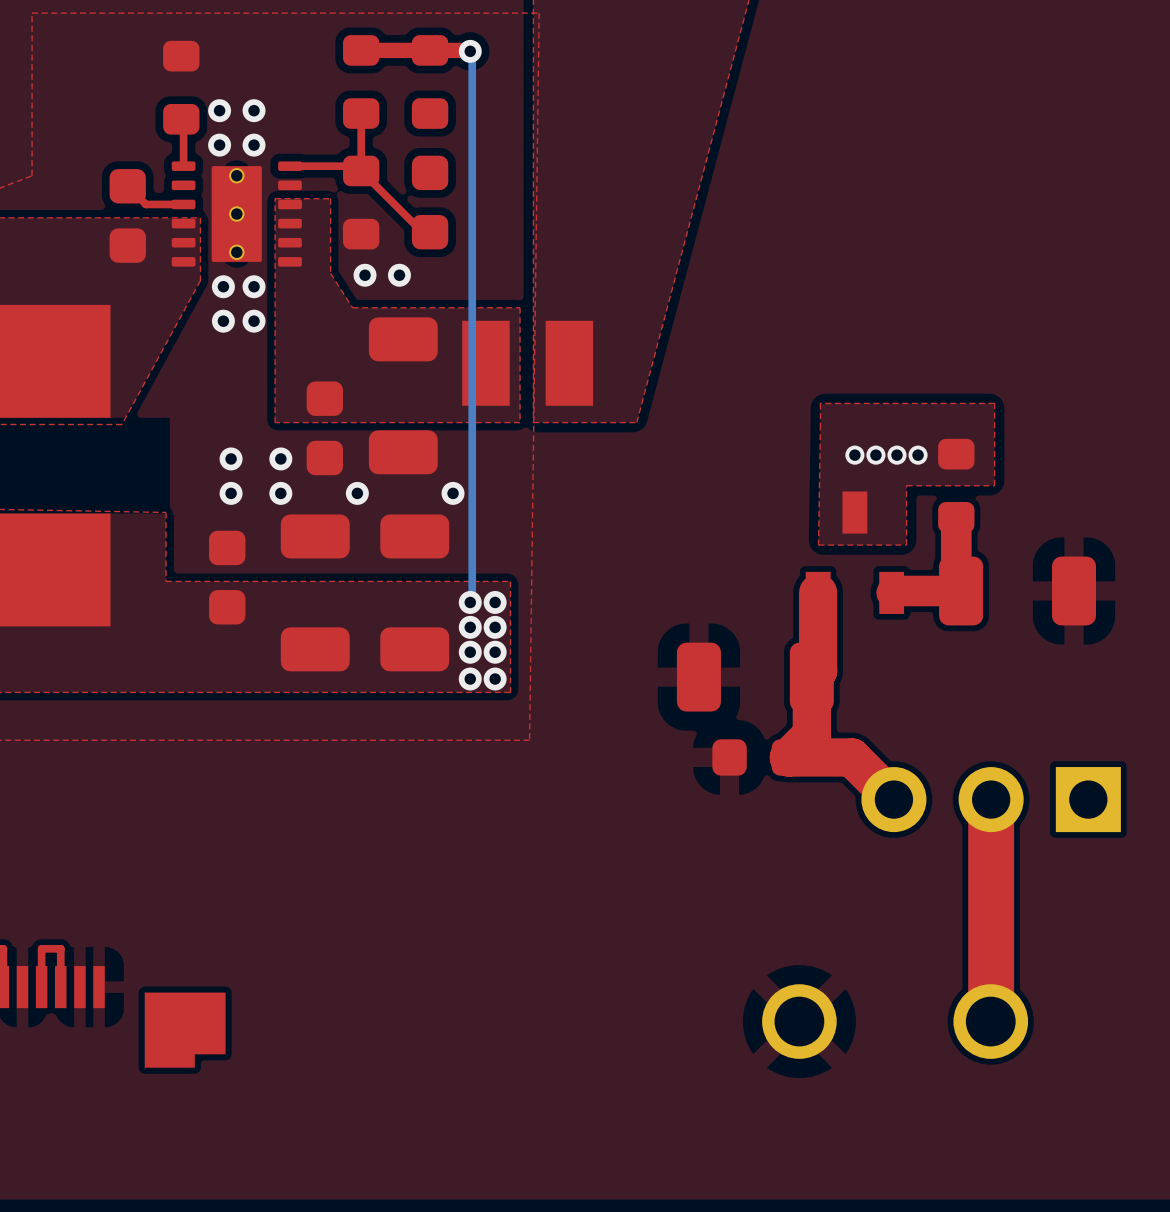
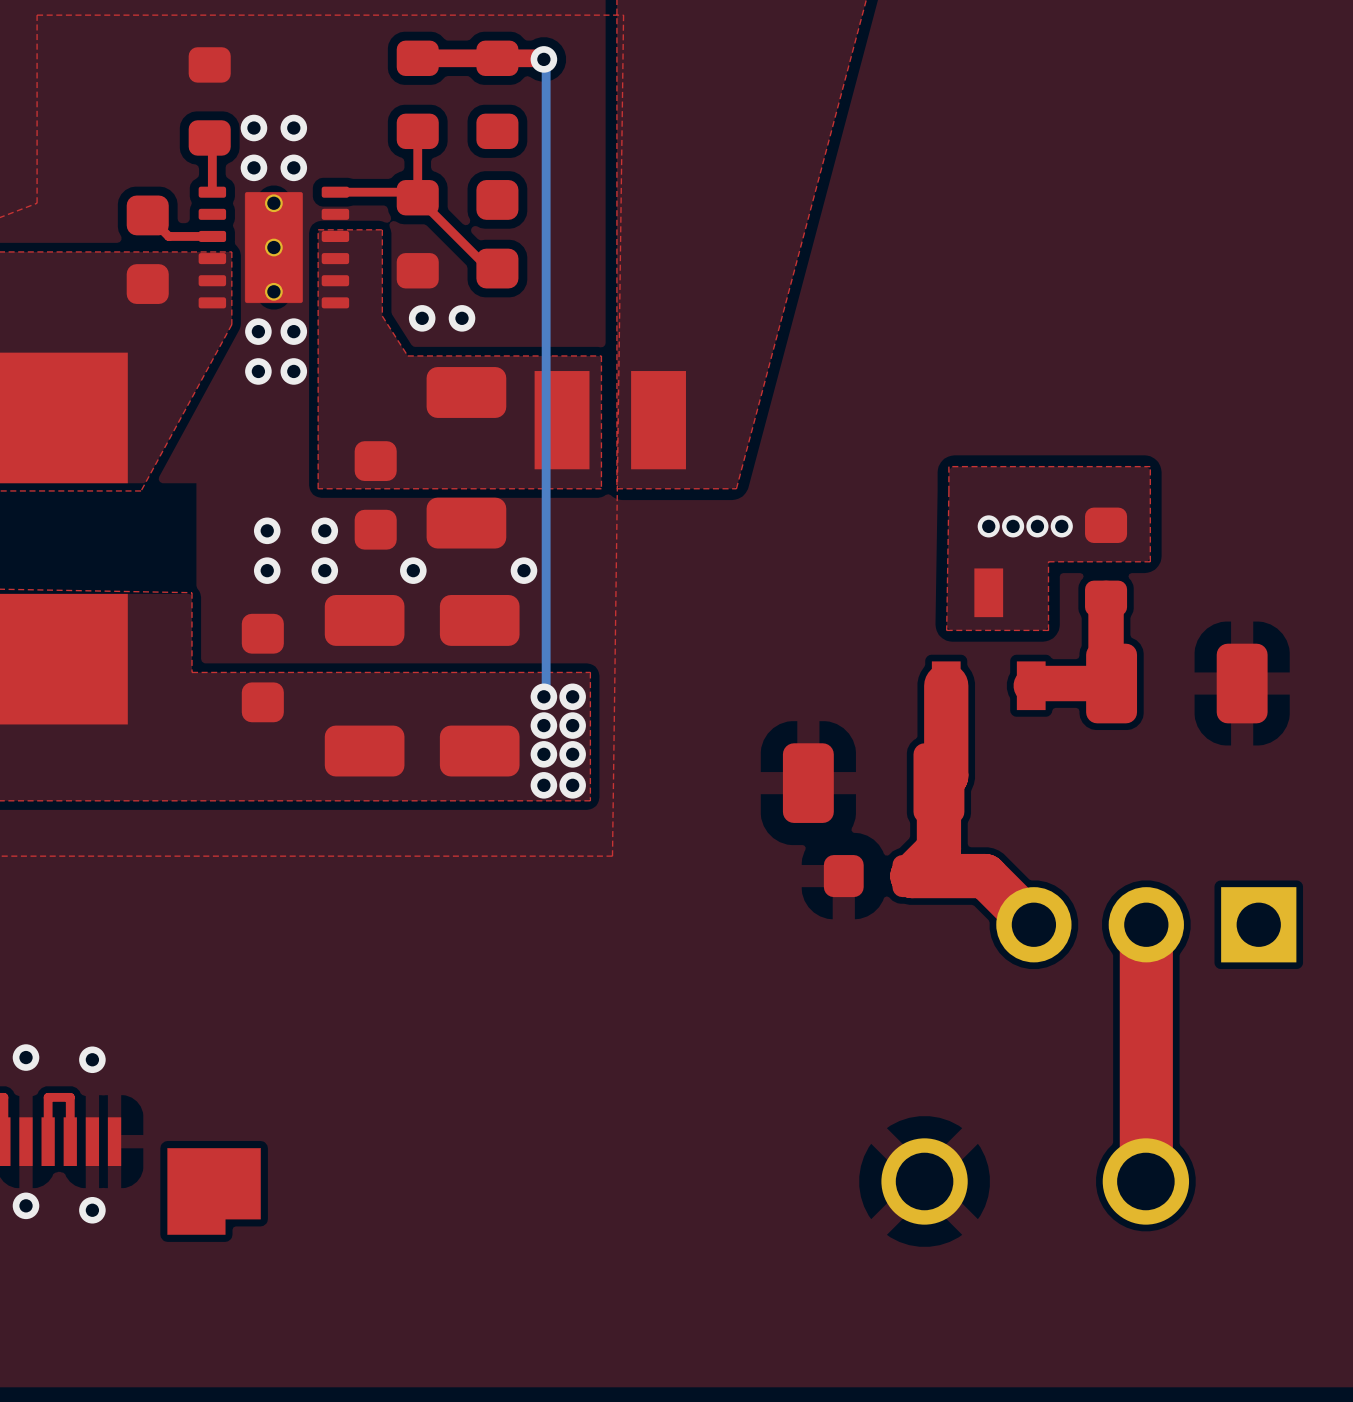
via: none -> (26, 1057)
via: none -> (92, 1059)
via: none -> (26, 1205)
via: none -> (92, 1210)

